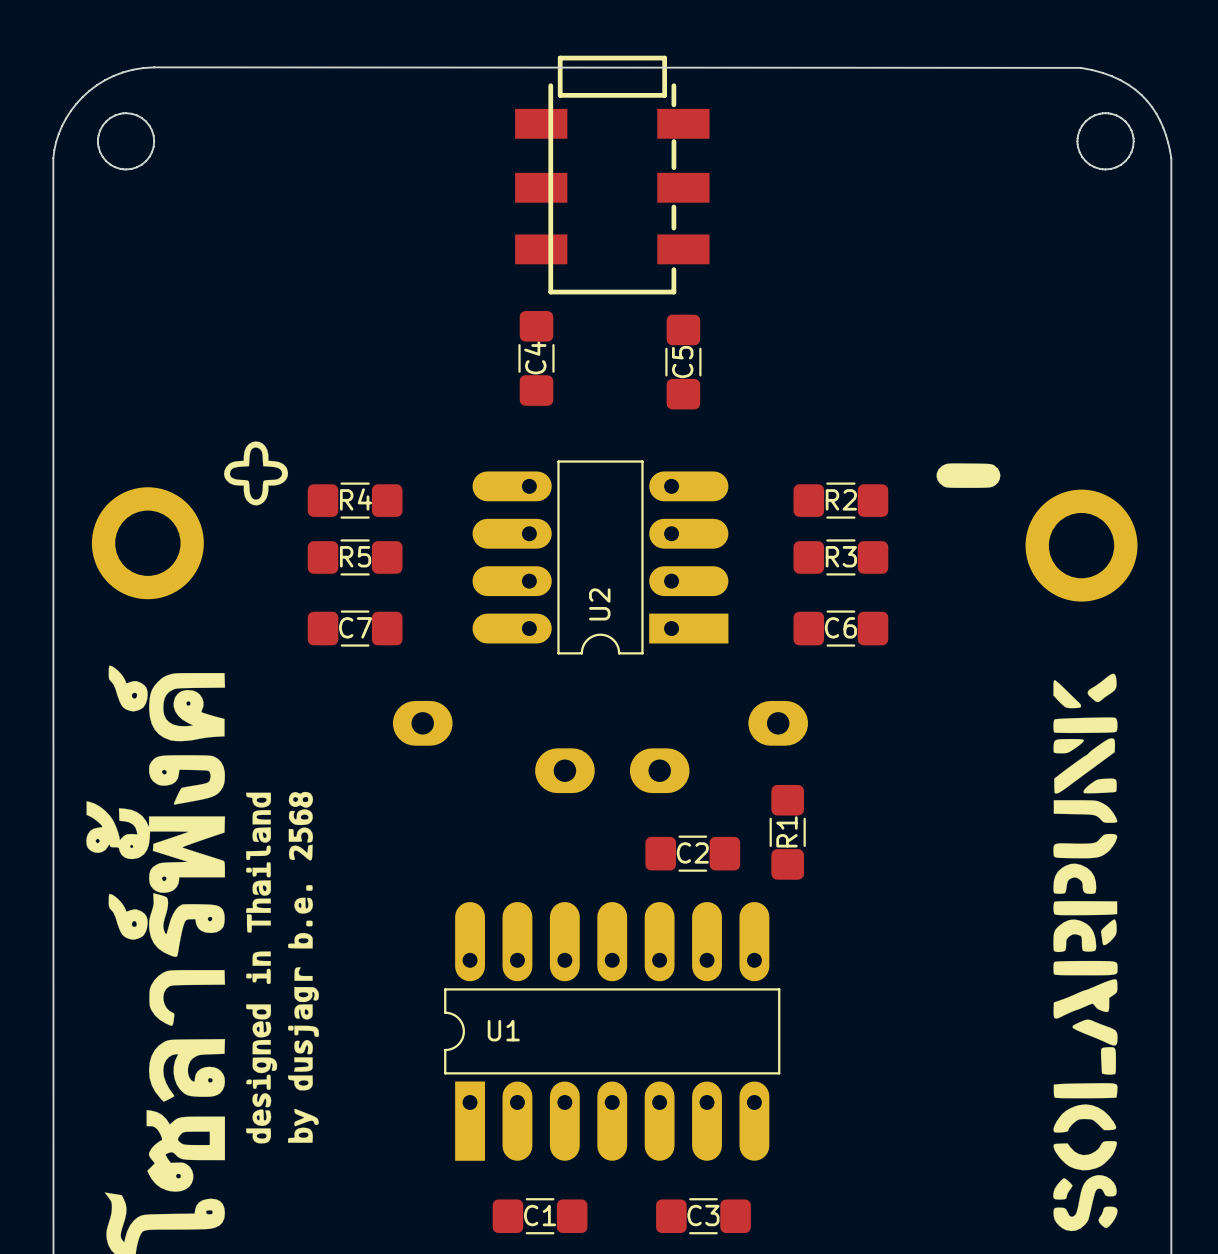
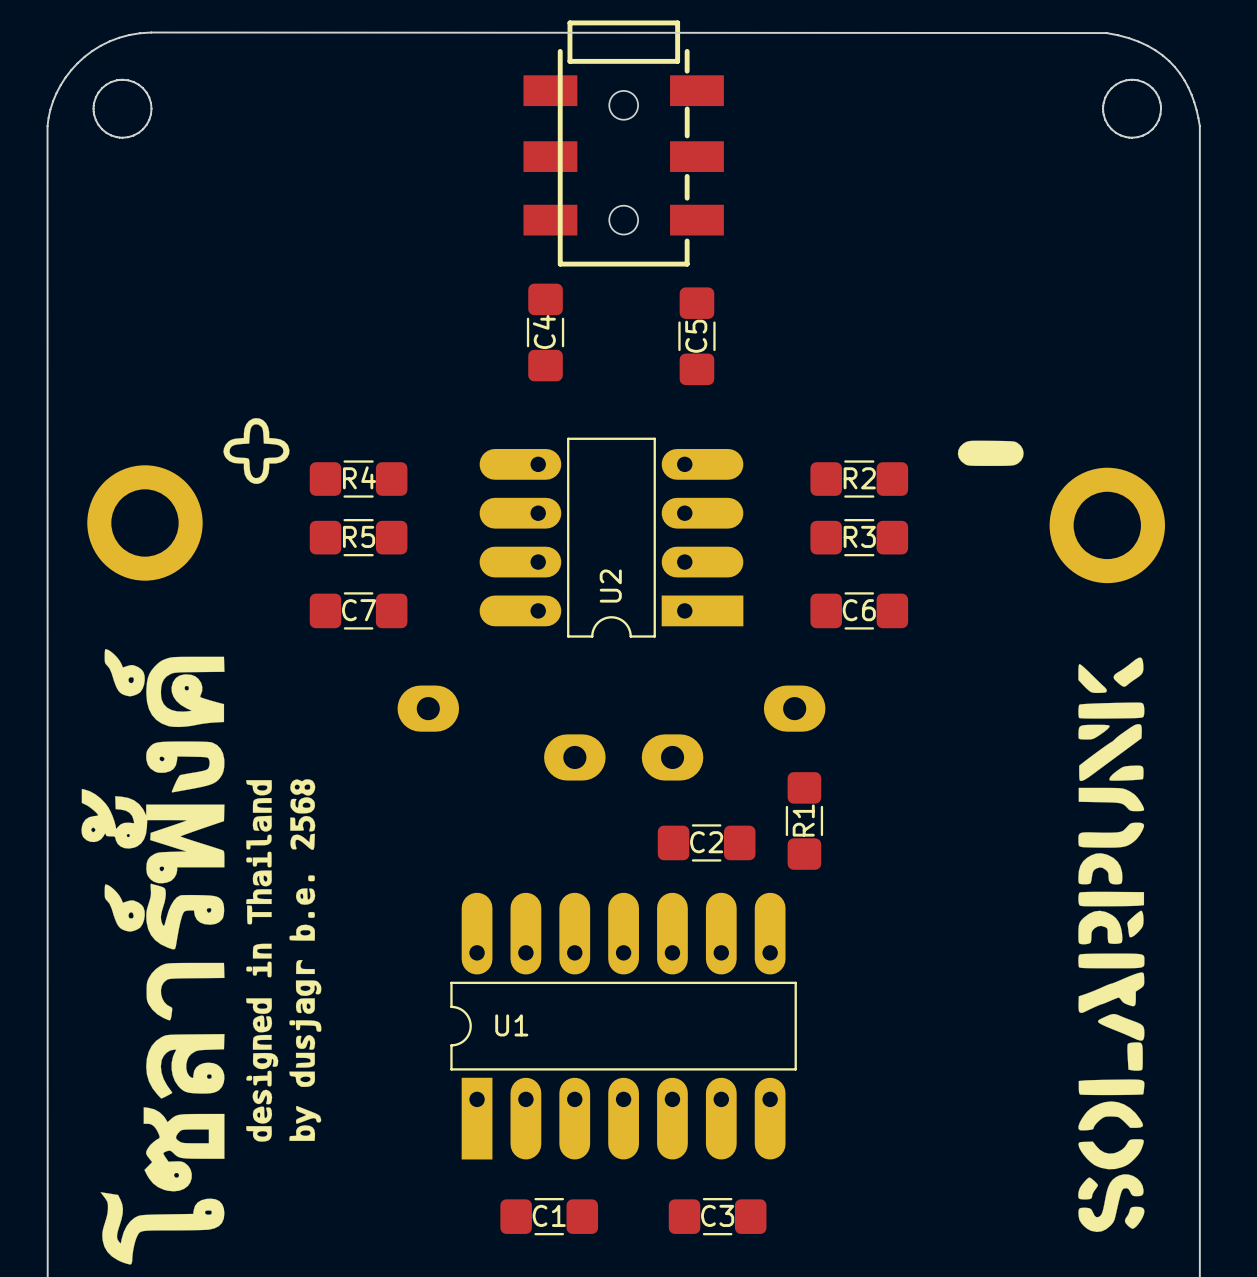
part footprint: [515, 55, 710, 295] -> [523, 20, 724, 267]

